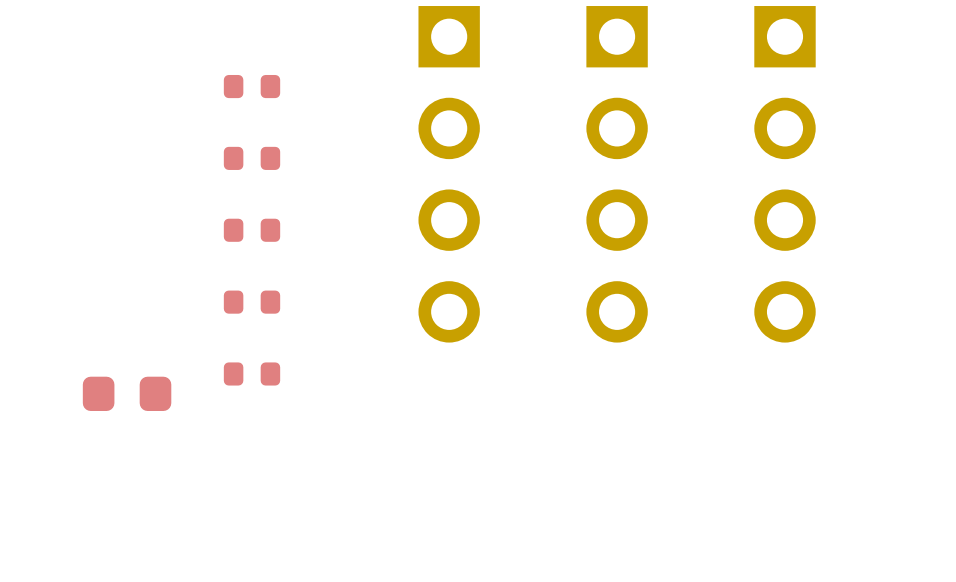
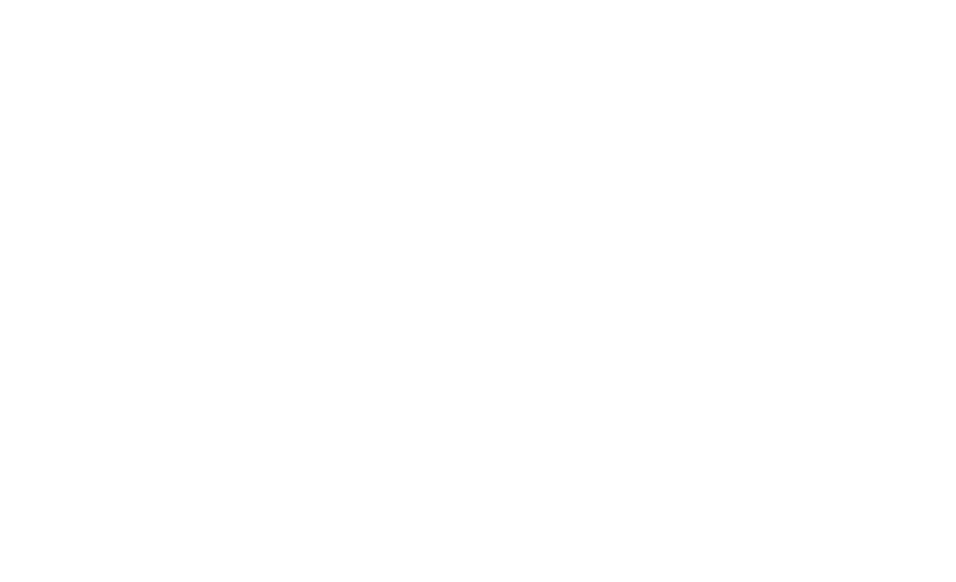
part: (252, 86) -> none
part: (252, 158) -> none
part: (449, 174) -> none
part: (617, 174) -> none
part: (785, 174) -> none
part: (252, 230) -> none
part: (252, 302) -> none
part: (252, 373) -> none
part: (127, 393) -> none

